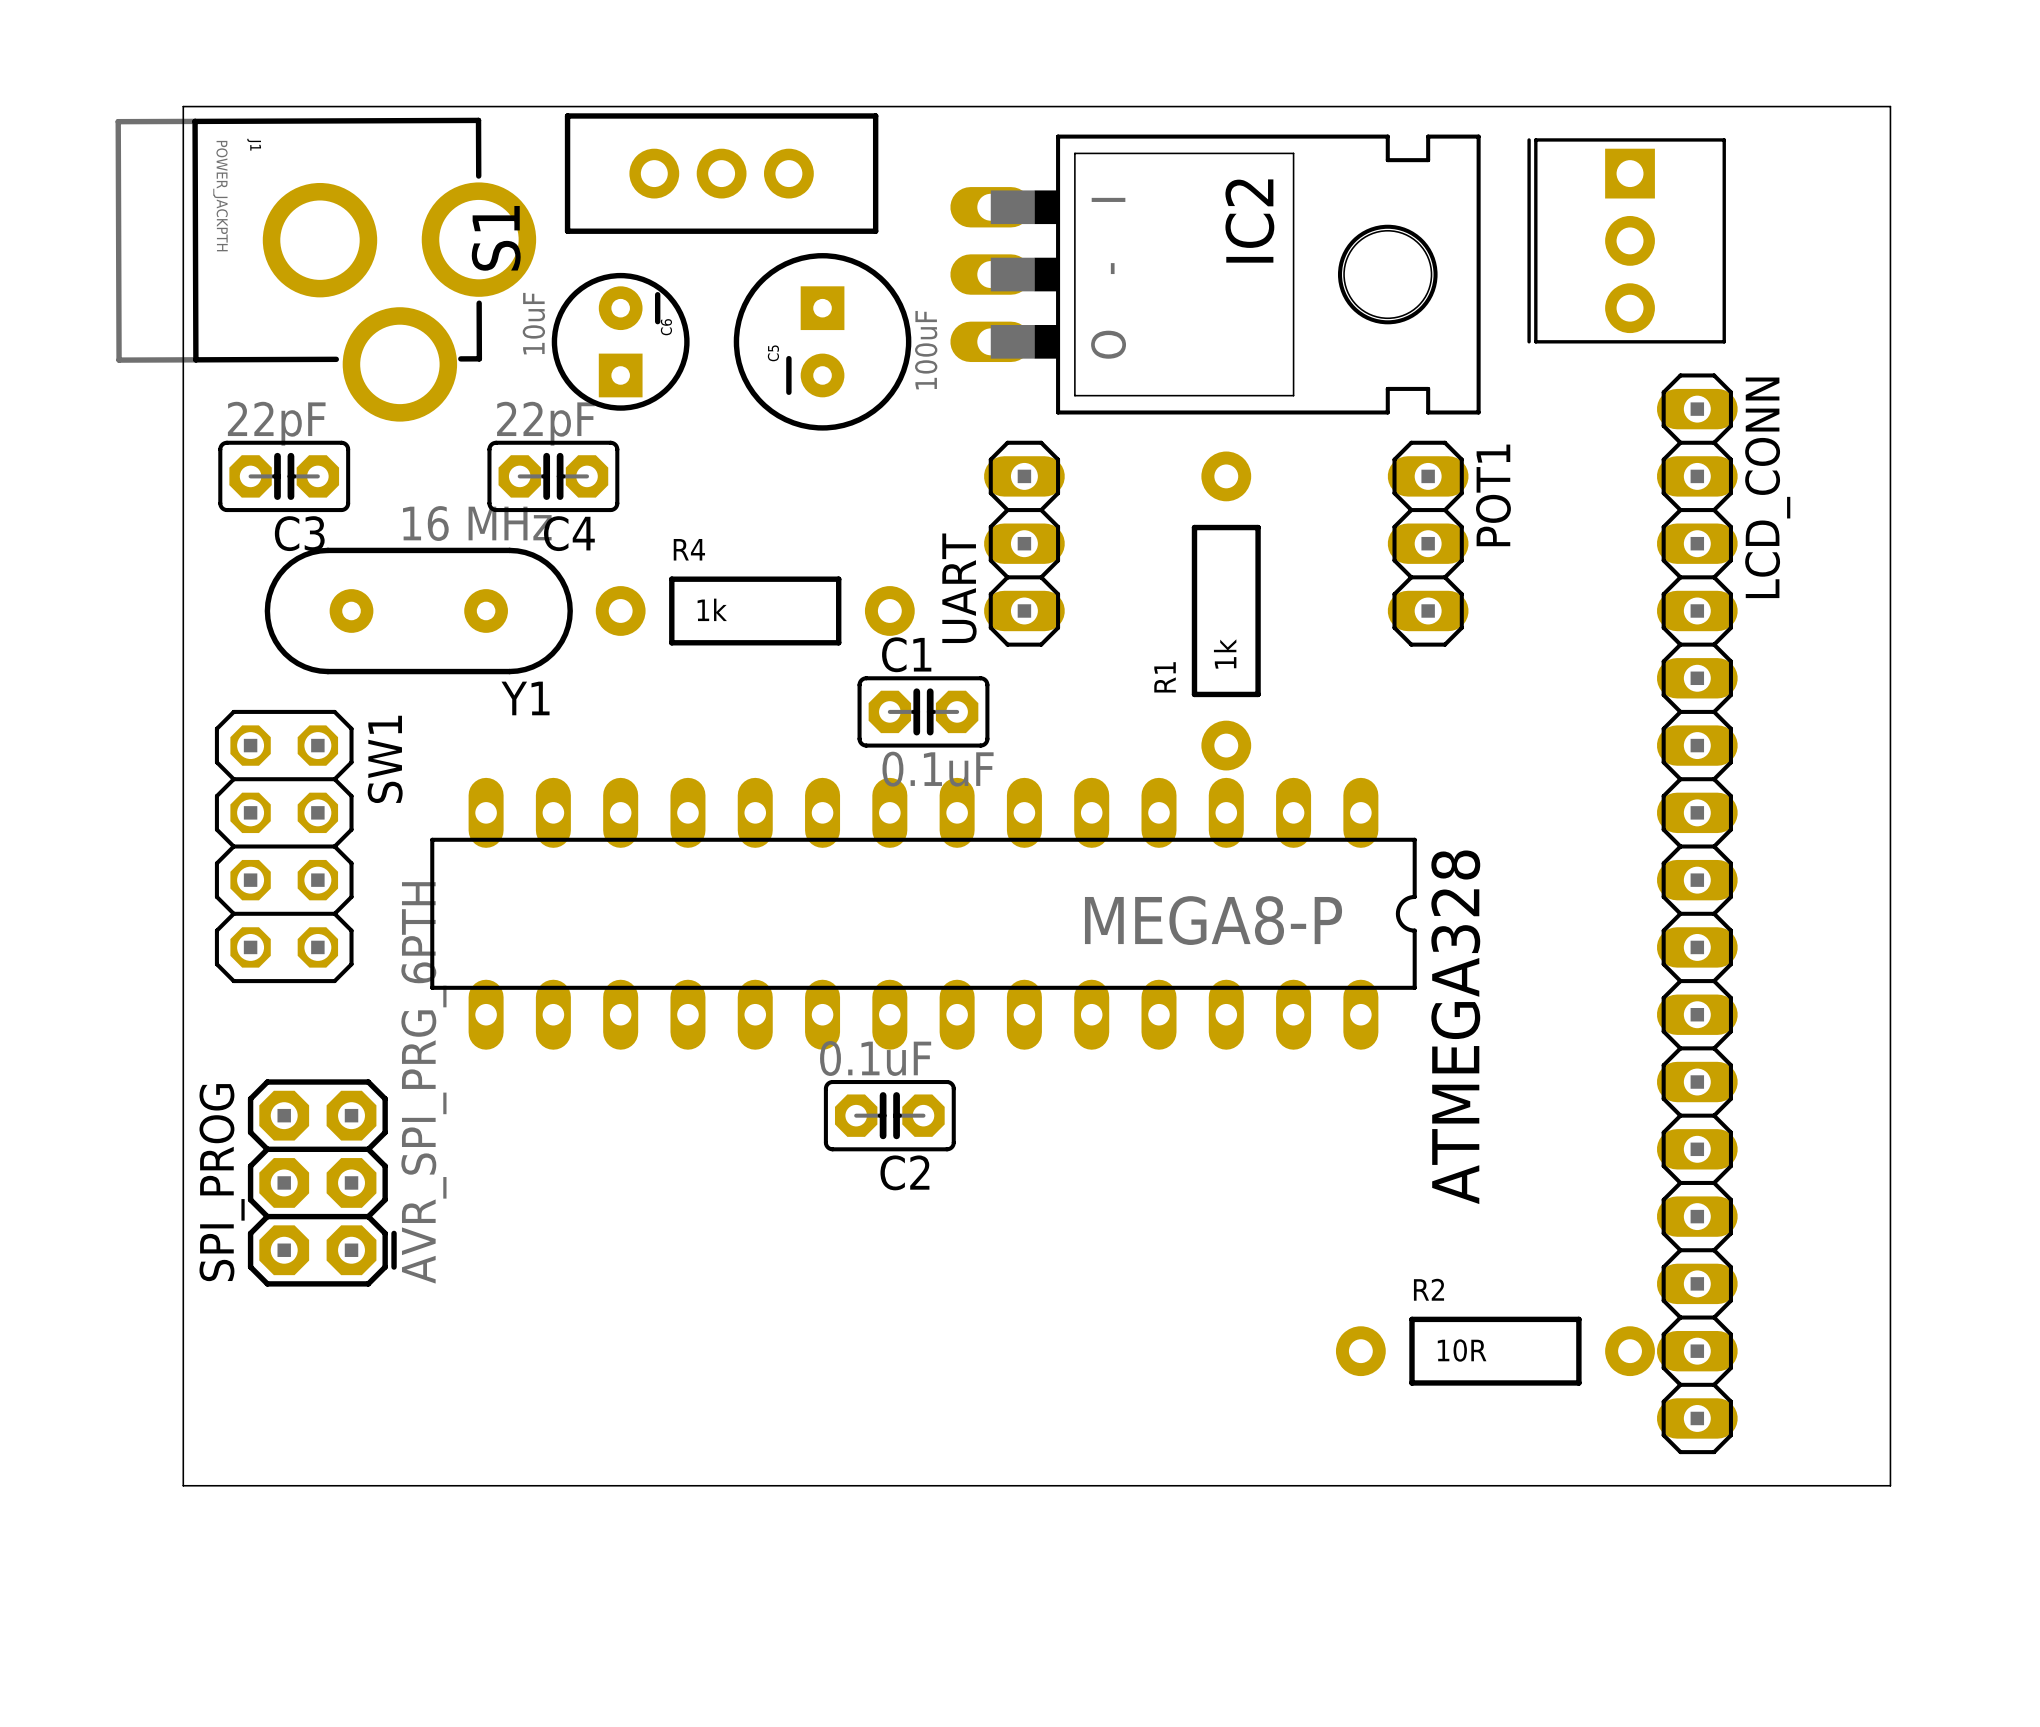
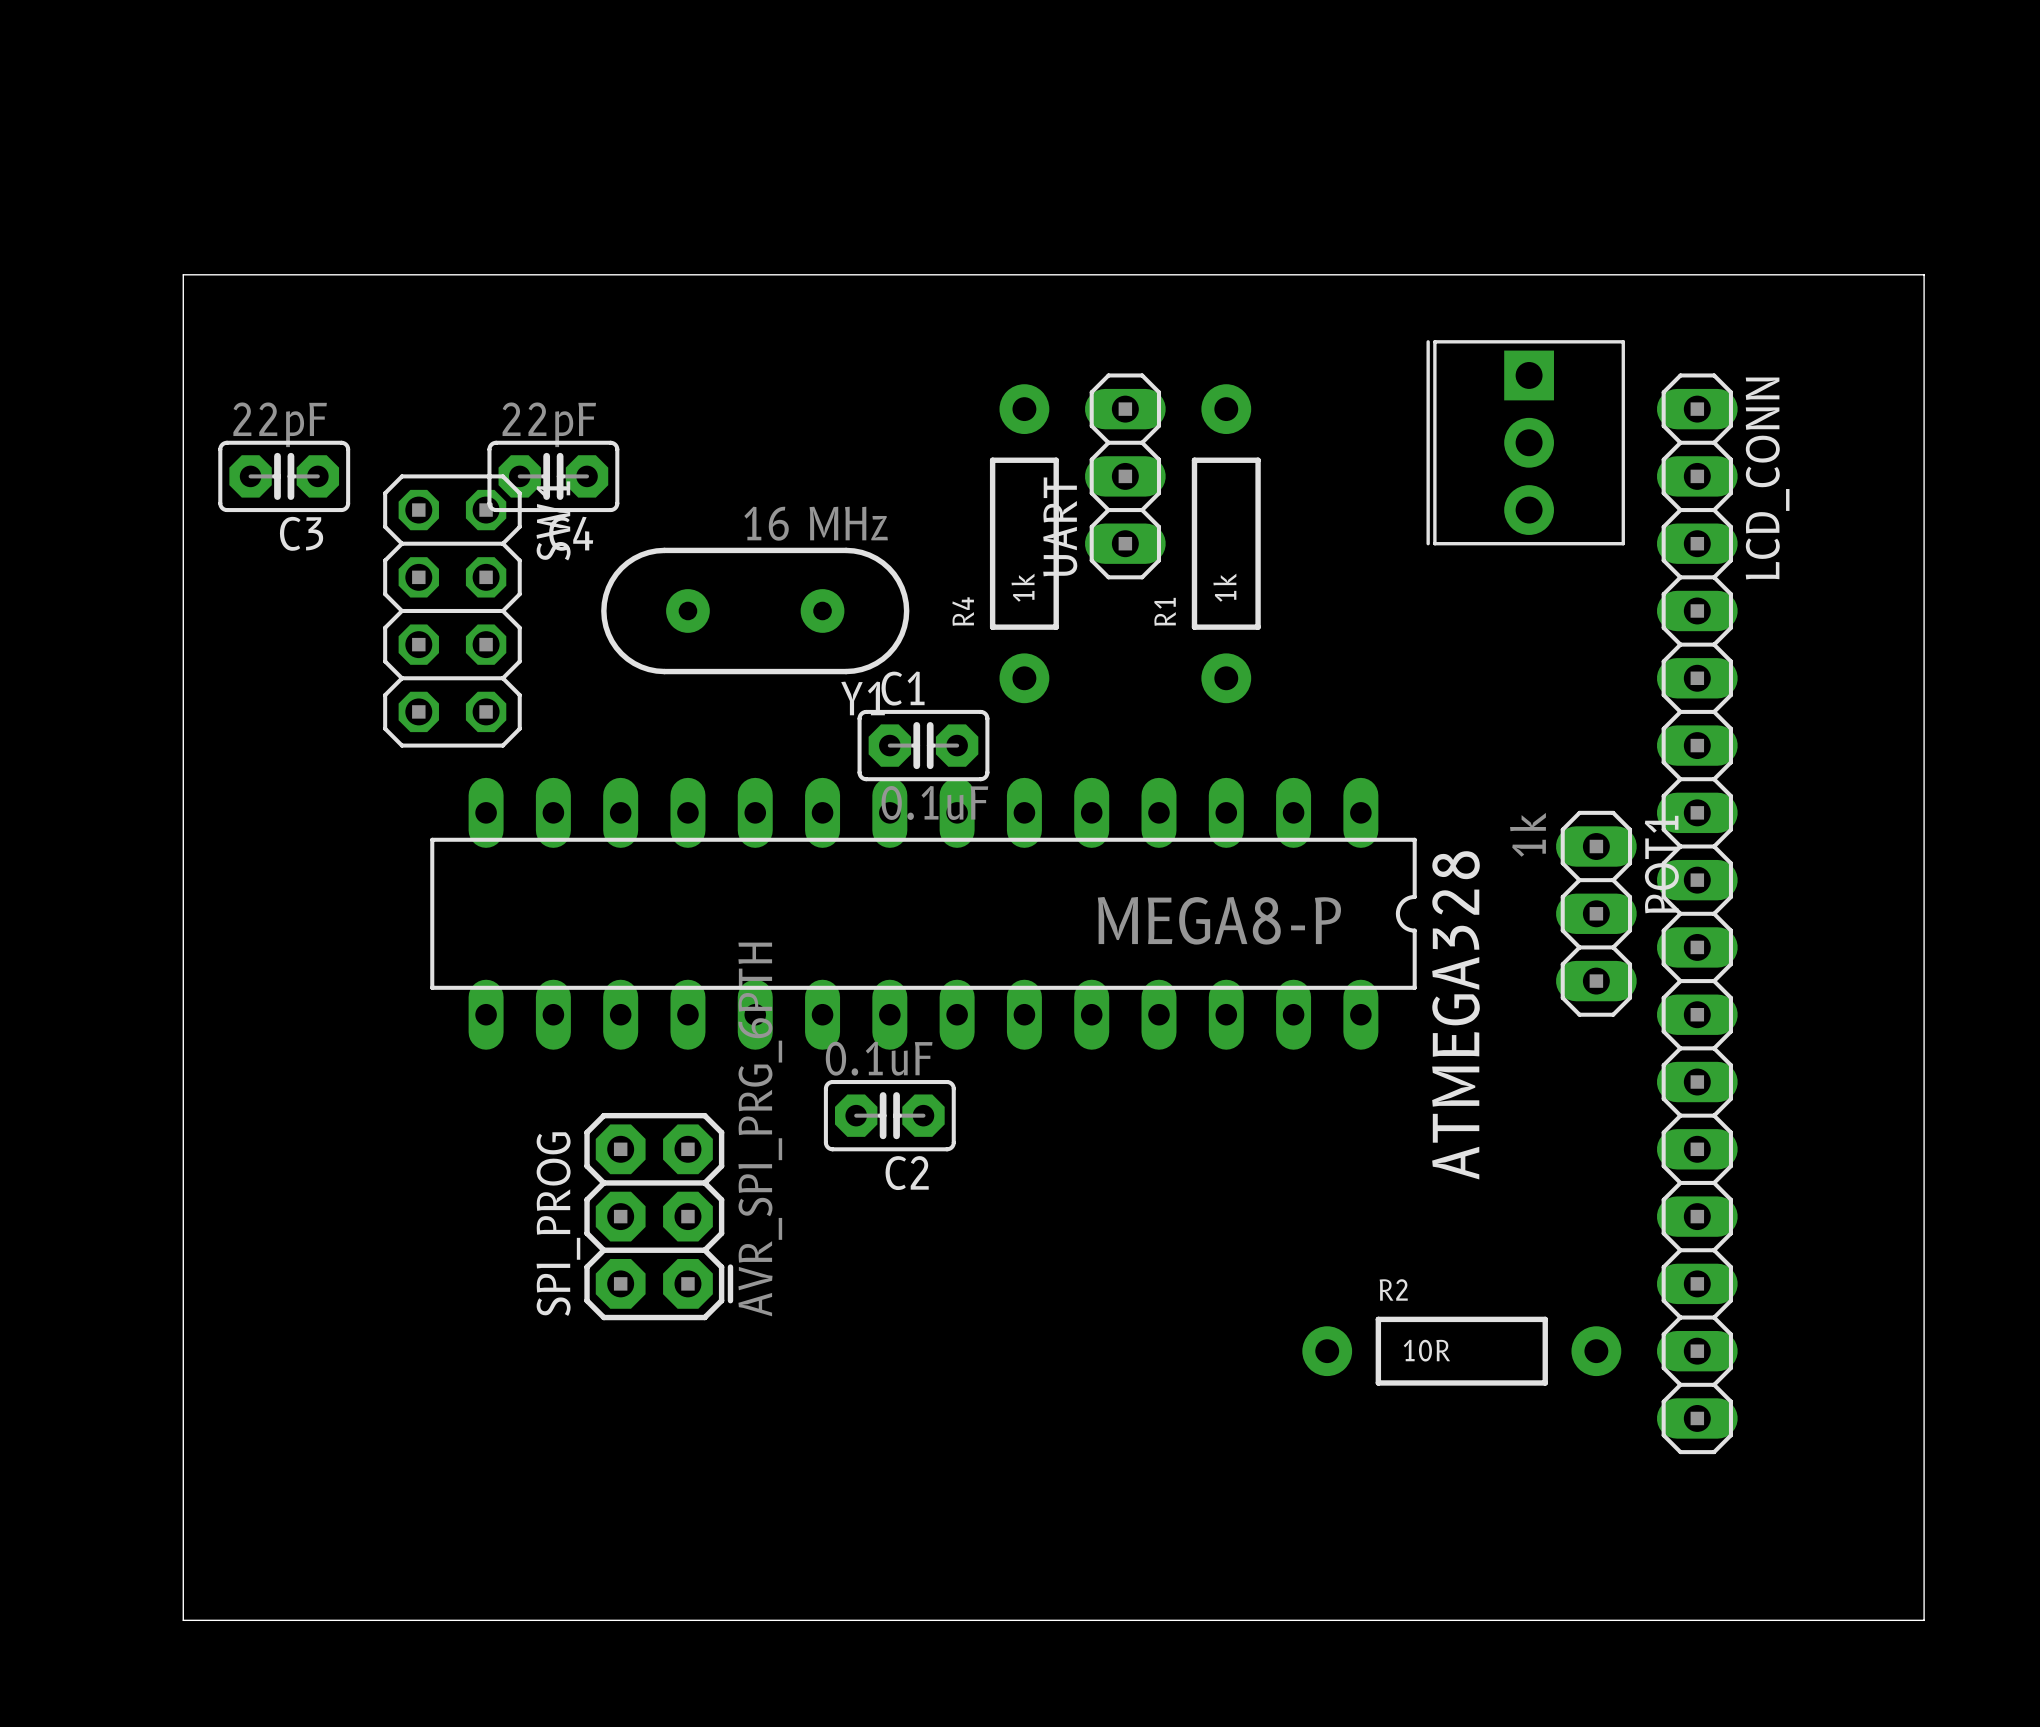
S1: (721, 173) -> none
part position: (1626, 240) -> (1525, 442)
J1: POWER_JACKPTH (325, 269) -> none
board edge: (183, 274) (183, 106) (1890, 106) (1890, 1485) (183, 1485) -> (183, 274) (1924, 274) (1924, 1620) (183, 1620) (183, 1485)
IC2: (1215, 274) -> none
C6: 10uF (620, 341) -> none
C5: 100uF (822, 341) -> none
UART position: (1024, 543) -> (1125, 476)
POT1 position: (1428, 543) -> (1596, 913)
R4 name position: R4 (689, 549) -> R4 (963, 611)
R4 value position: 1k (712, 609) -> 1k (1023, 587)
Y1 position: (418, 610) -> (755, 610)
R4 rotation: 0° (755, 610) -> 90° clockwise (1024, 543)
R4 position: (755, 610) -> (1024, 543)
R1 position: (1226, 610) -> (1226, 543)
C1 position: (923, 711) -> (923, 745)
POT1 value: none -> 1k (1527, 834)
SW1 position: (284, 846) -> (452, 610)
SPI_PROG position: (322, 1182) -> (658, 1216)
R2 position: (1495, 1351) -> (1461, 1351)

